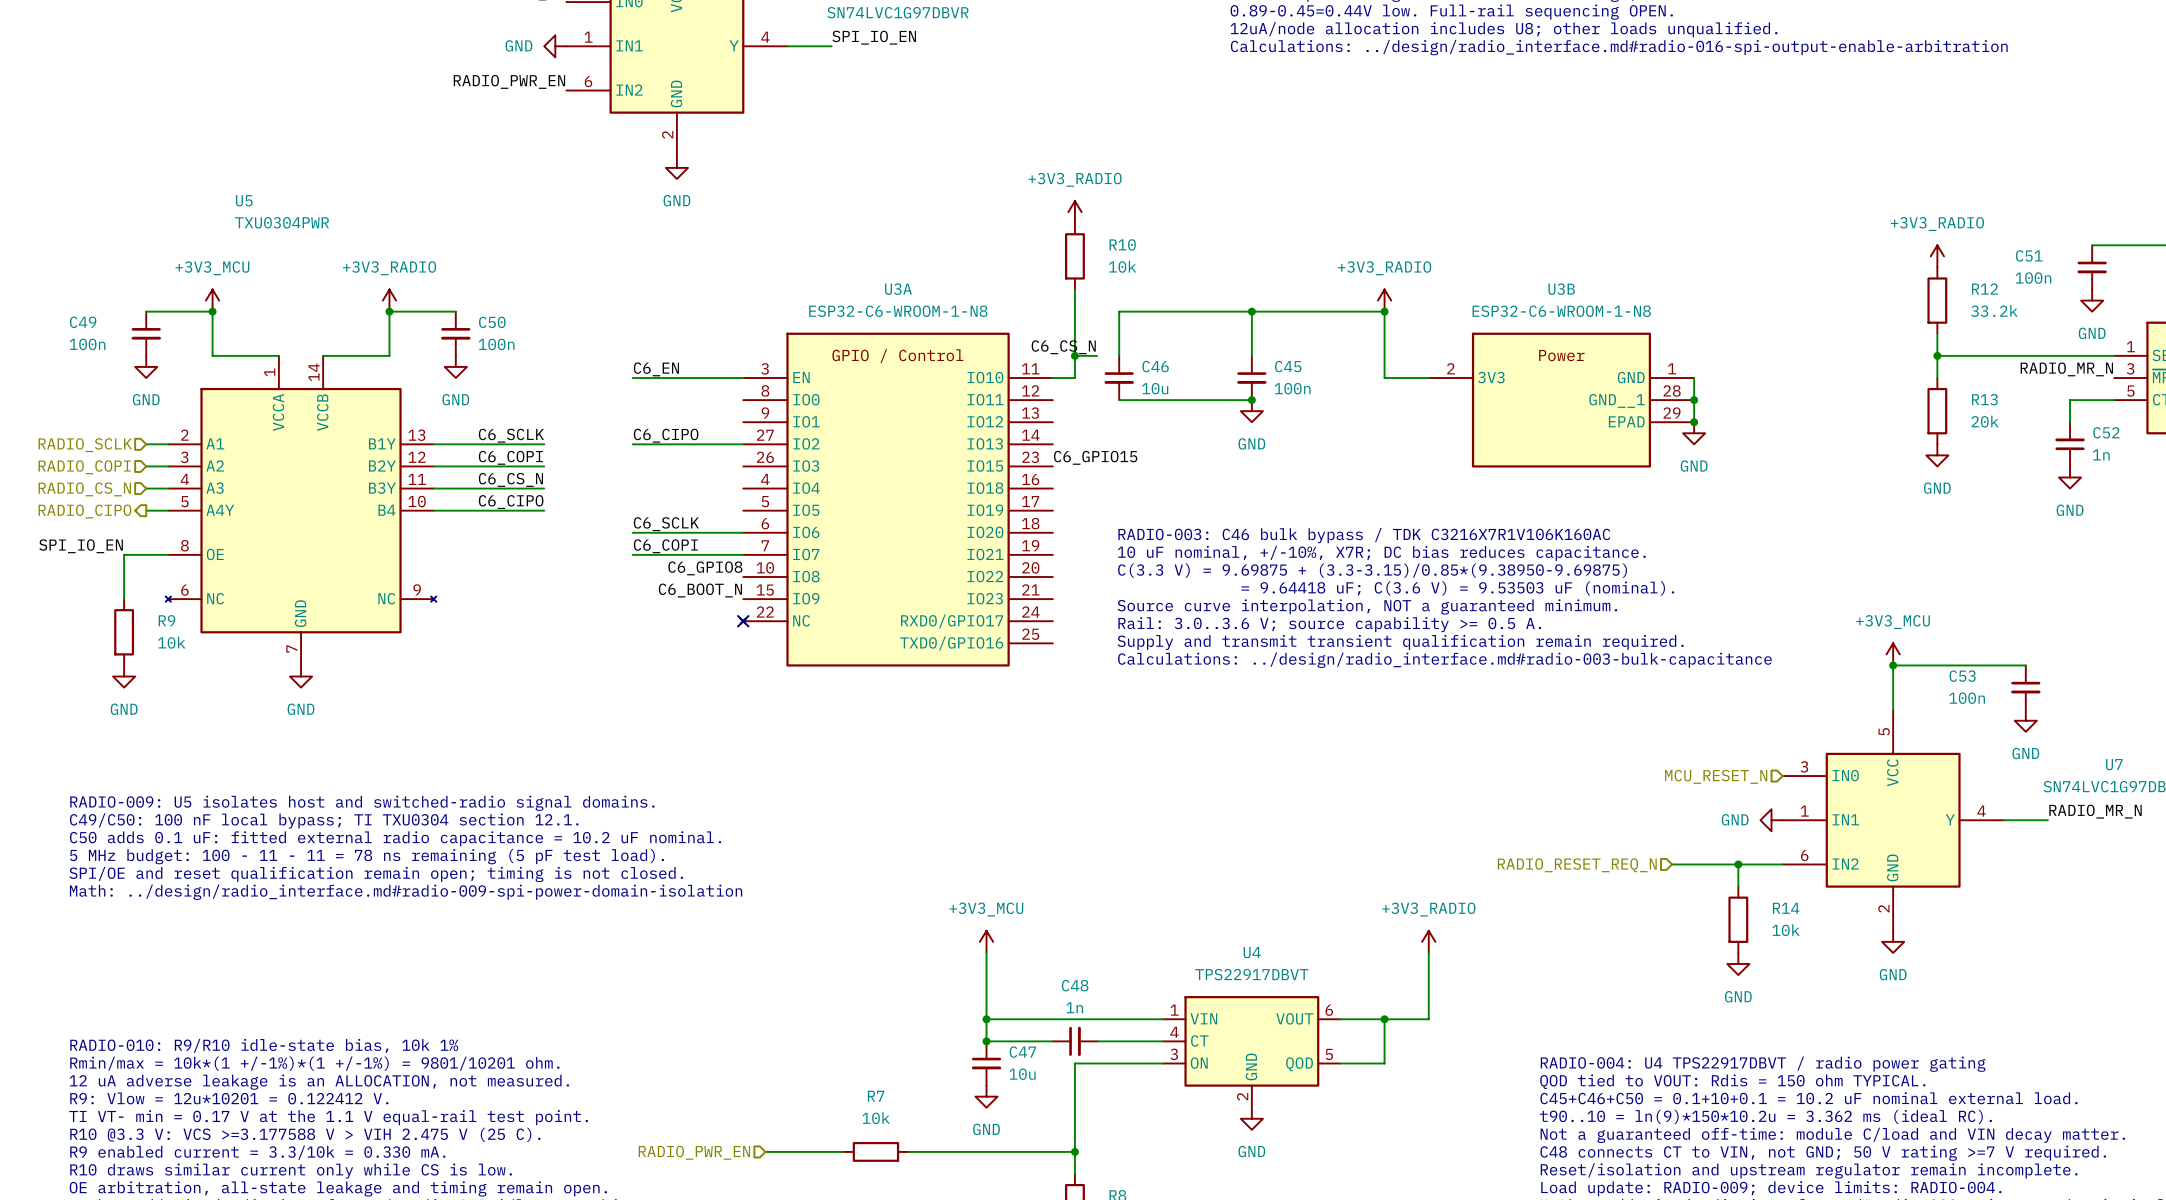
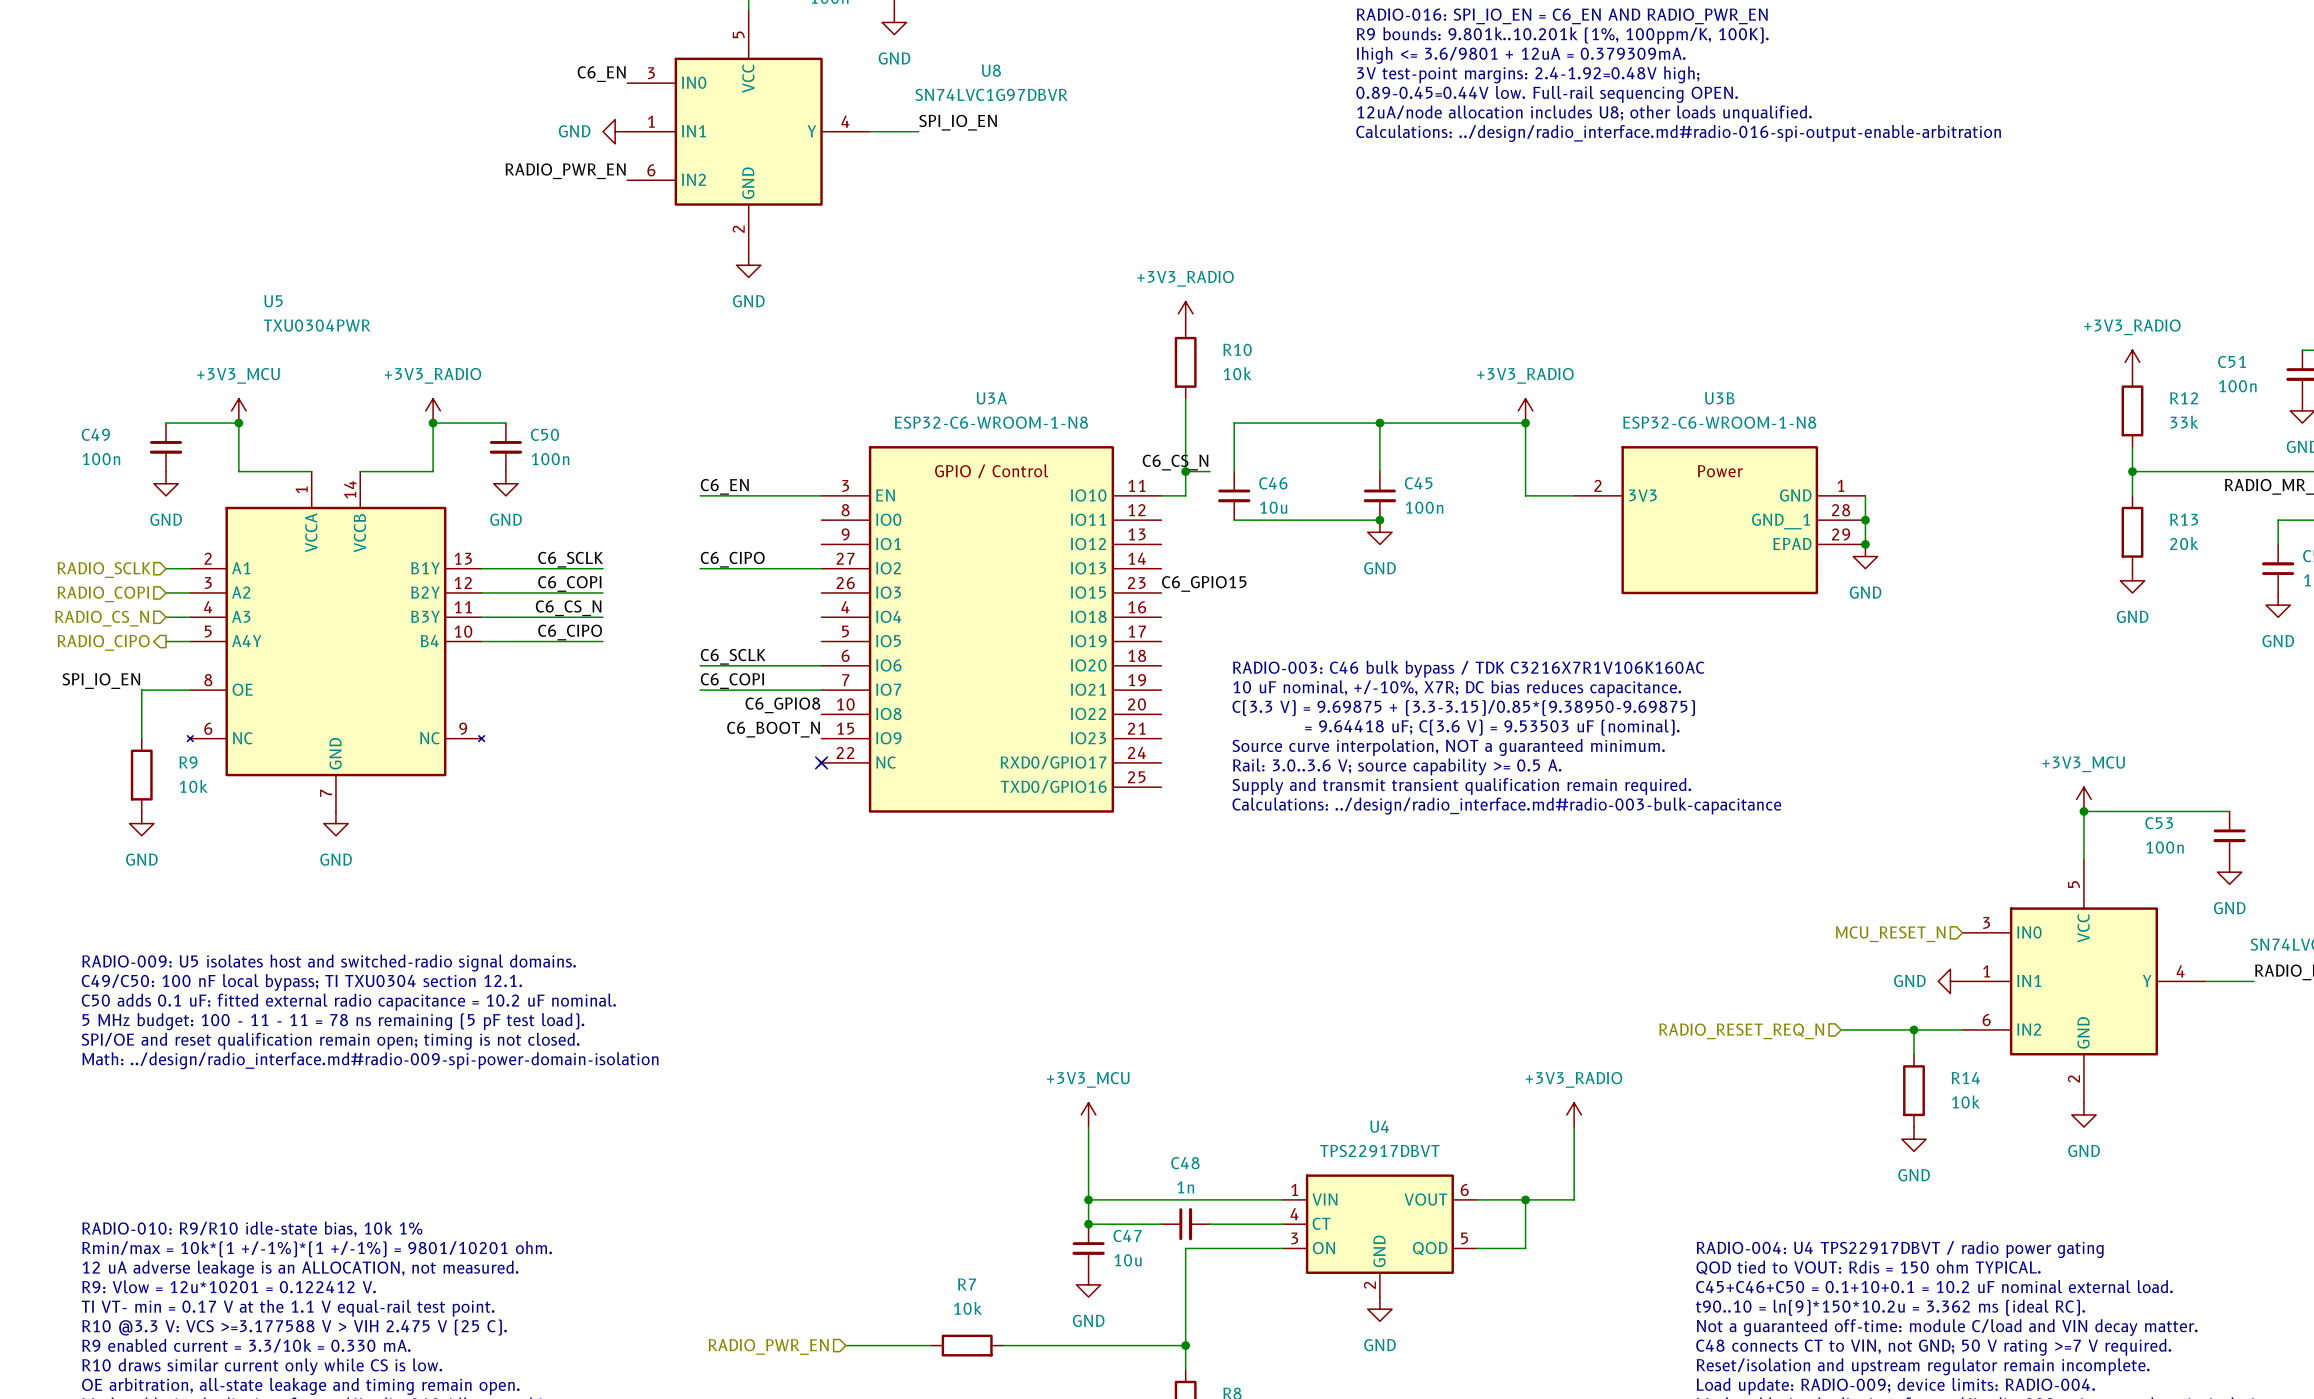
R12 value: 33.2k (1994, 311) -> 33k (2184, 422)

